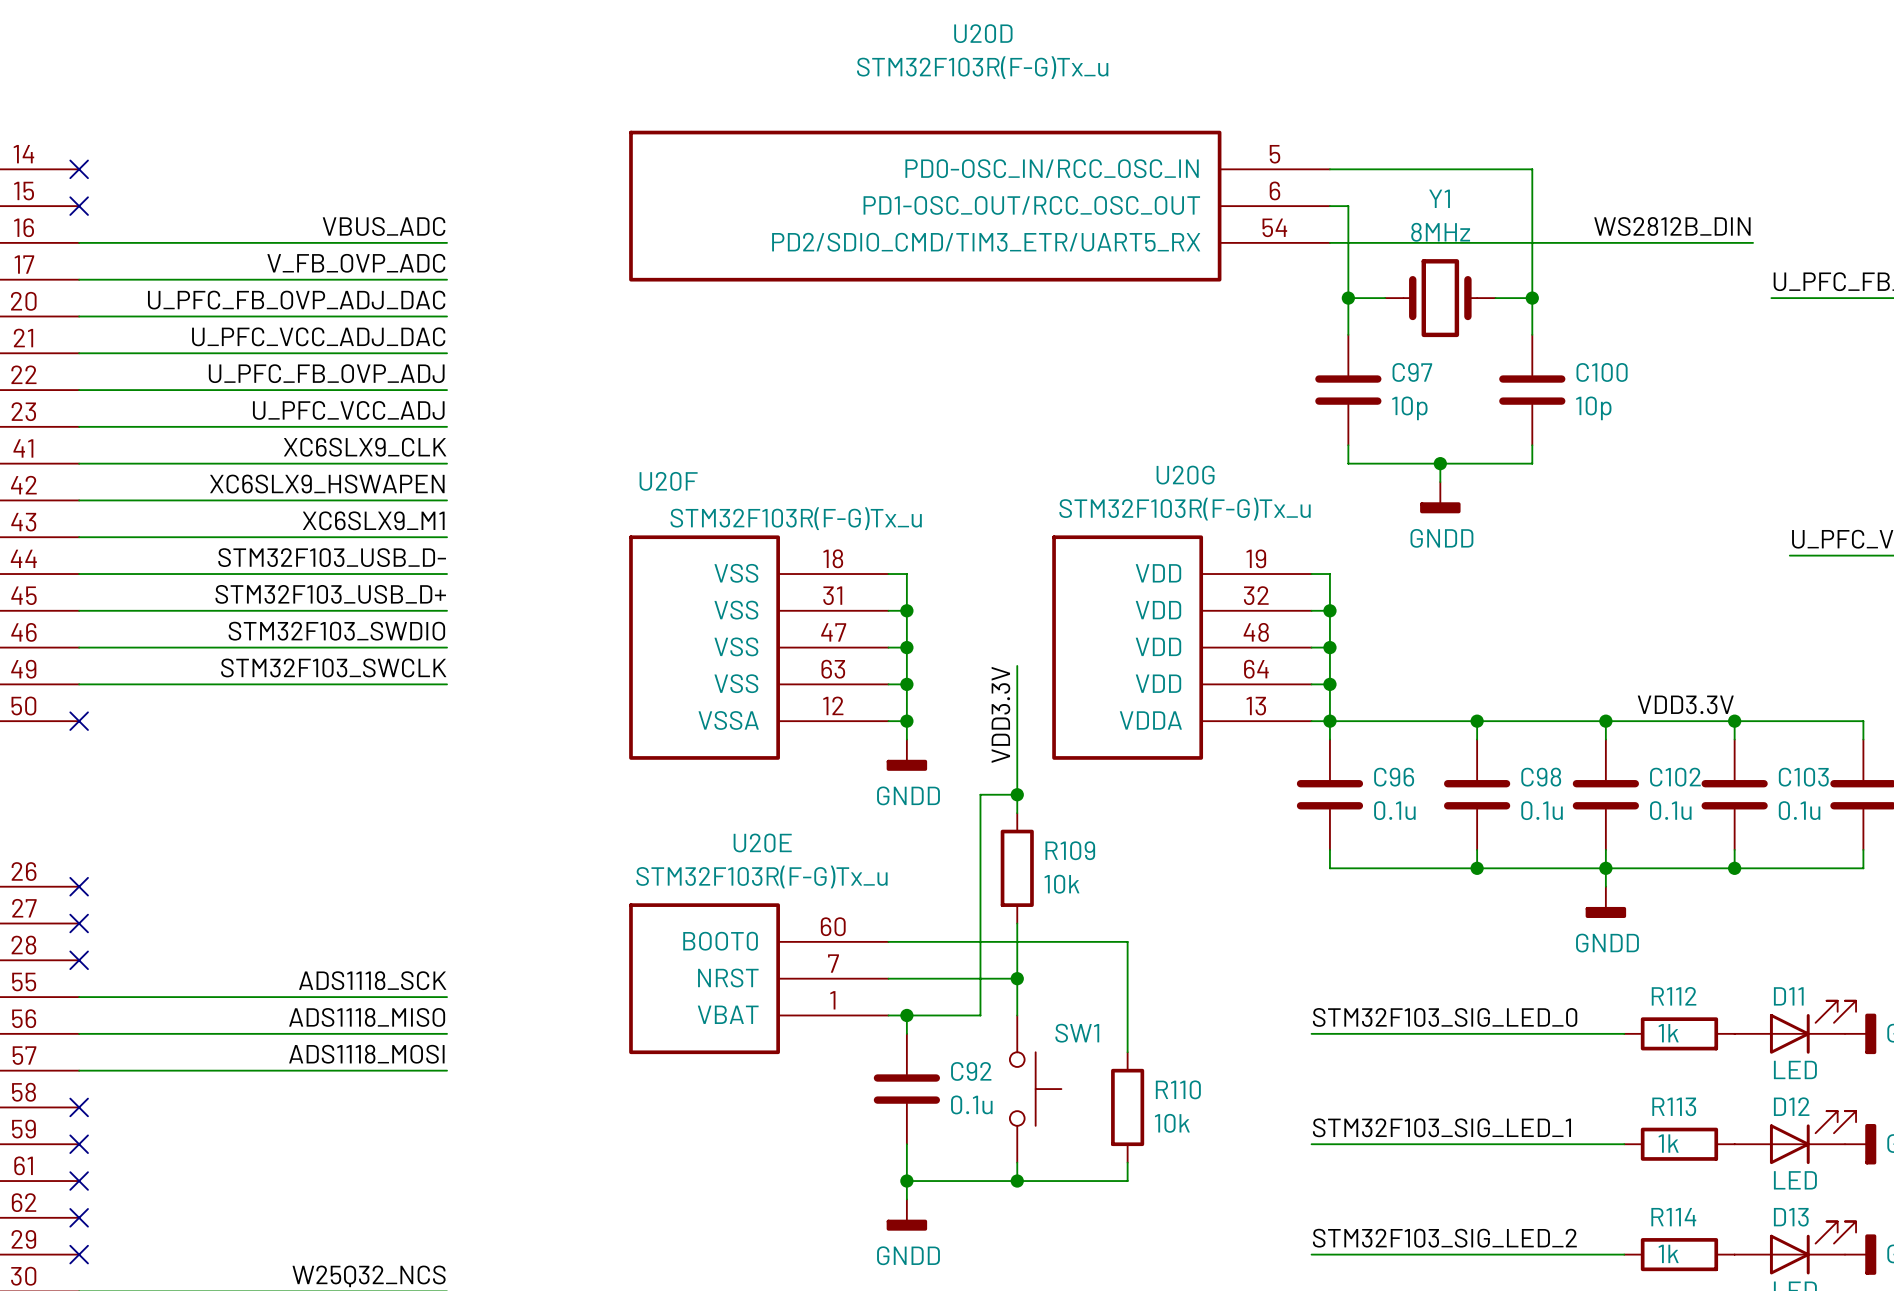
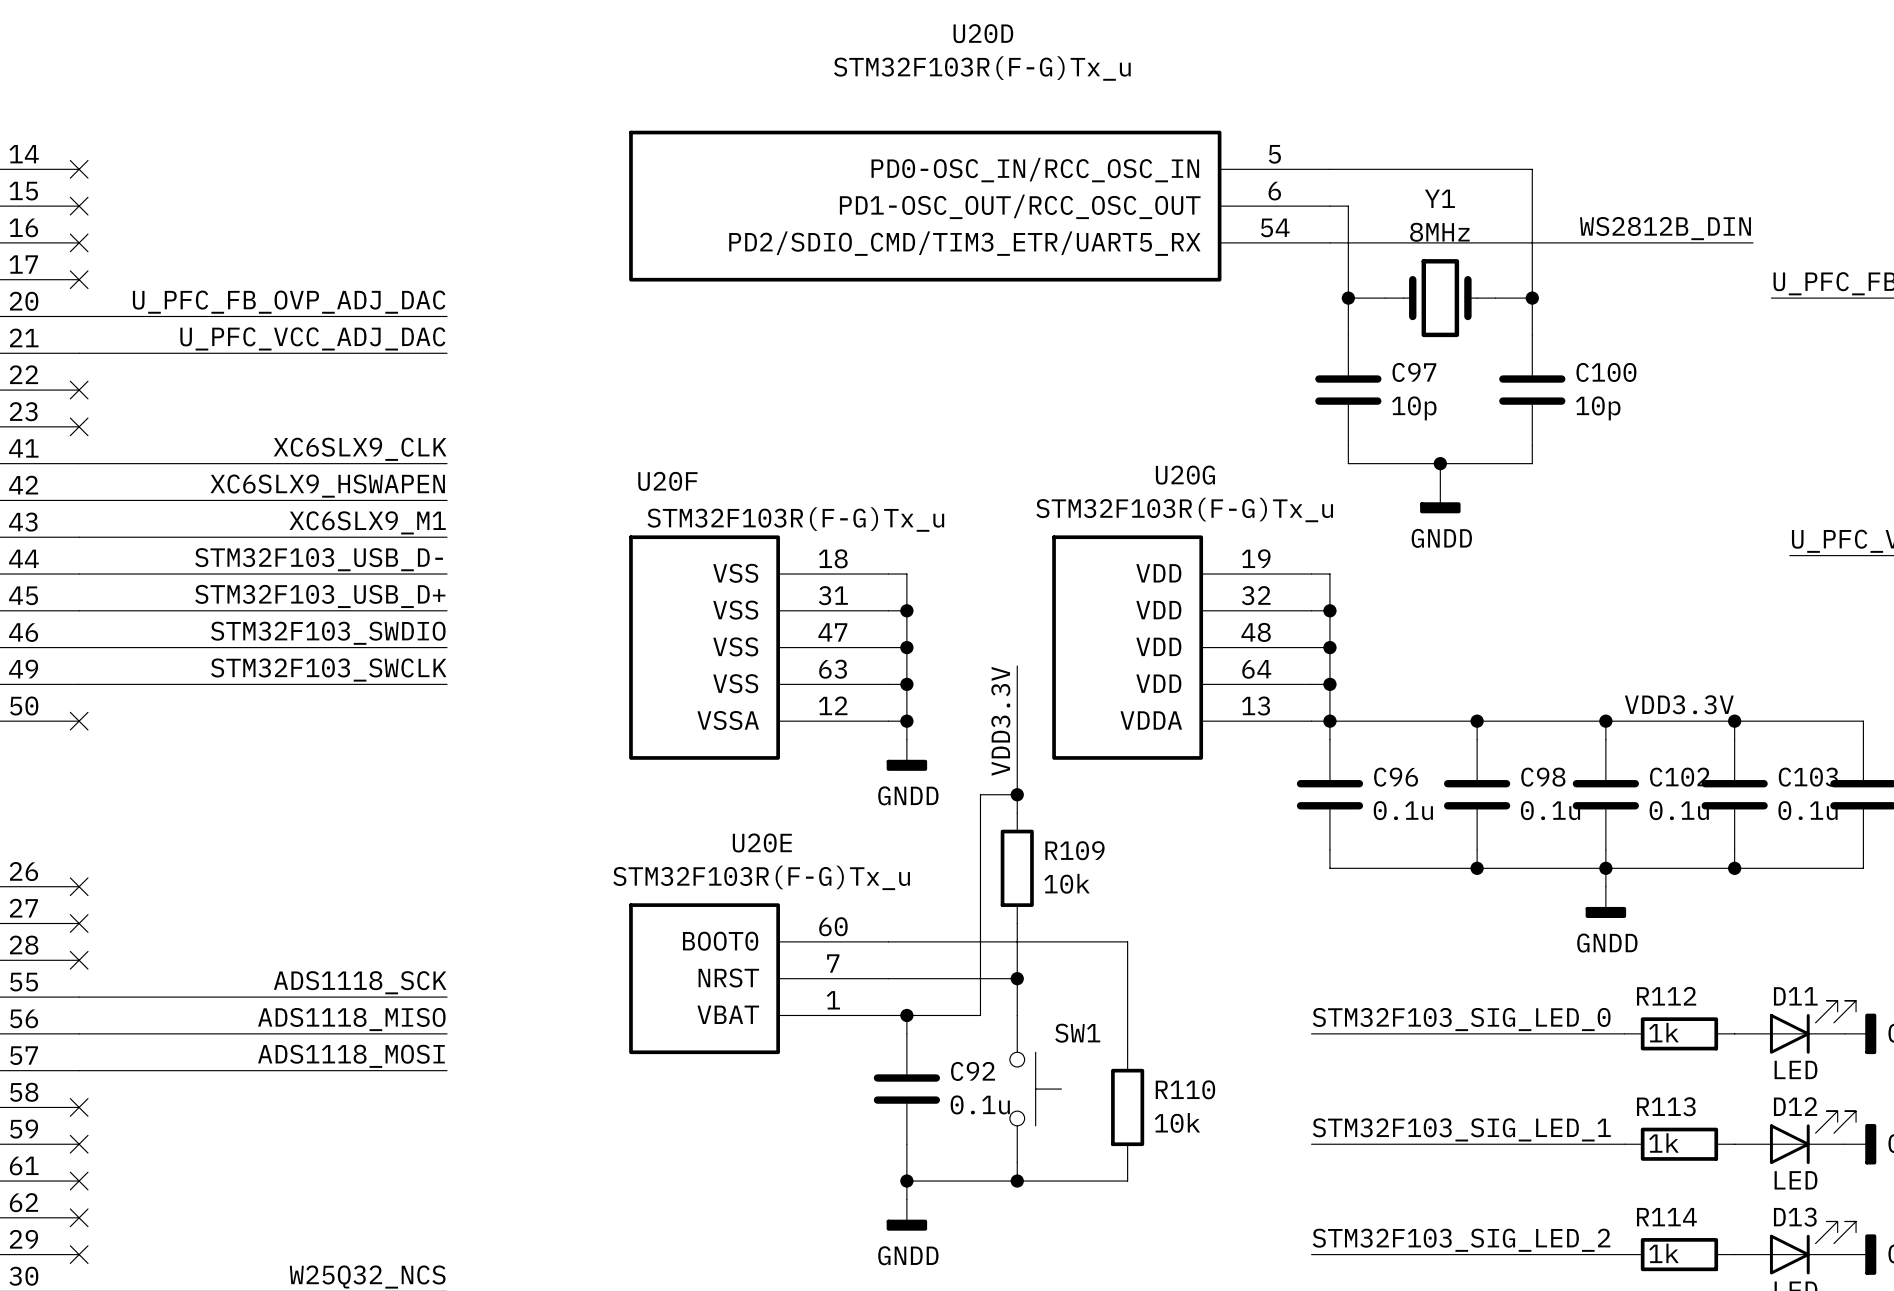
label: VBUS_ADC (384, 226) -> none
wire: (79, 242) (447, 242) -> none
no-connect mark: none -> (79, 242)
label: V_FB_OVP_ADC (356, 263) -> none
wire: (79, 279) (447, 279) -> none
no-connect mark: none -> (79, 279)
label: U_PFC_FB_OVP_ADJ (326, 373) -> none
wire: (79, 390) (447, 390) -> none
no-connect mark: none -> (79, 390)
label: U_PFC_VCC_ADJ (348, 410) -> none
wire: (79, 426) (447, 426) -> none
no-connect mark: none -> (79, 426)

